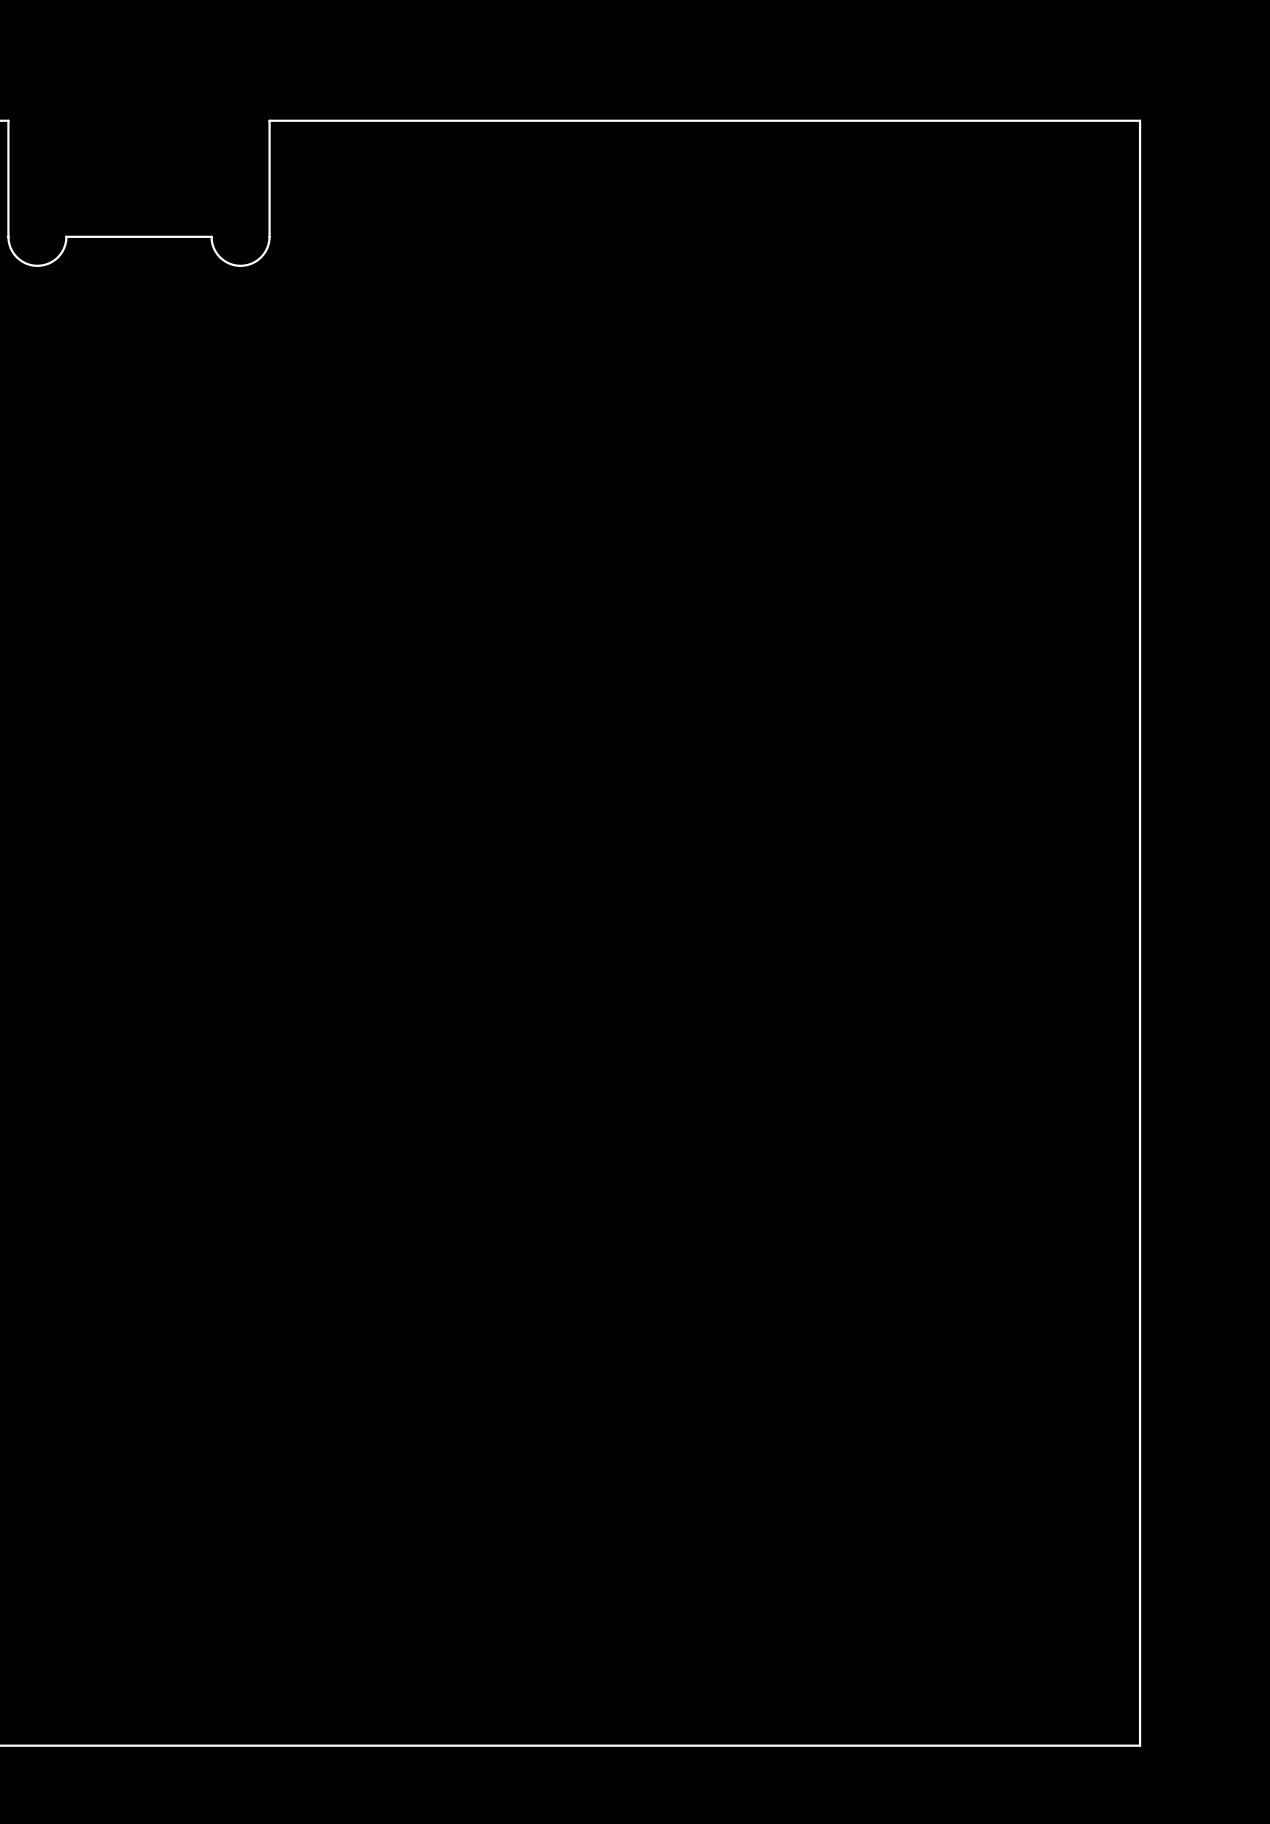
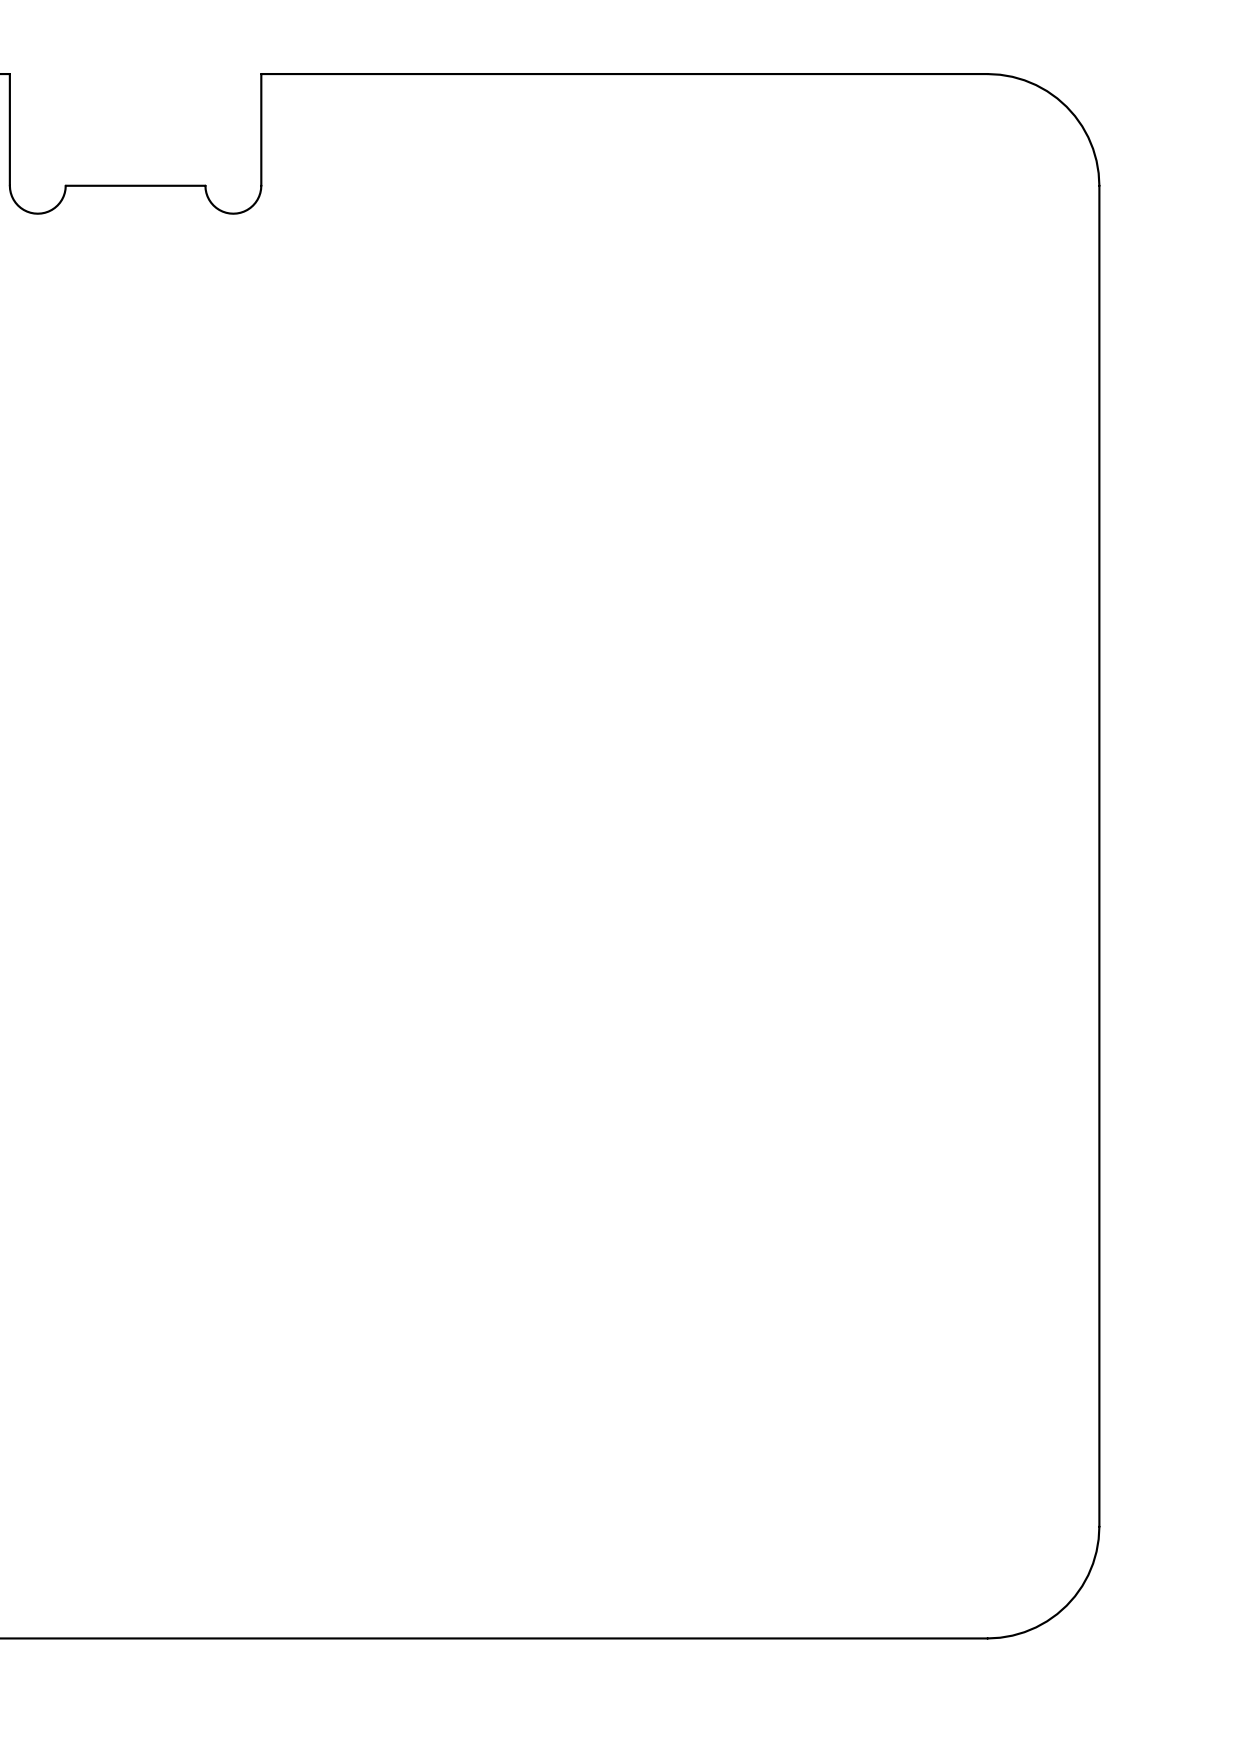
board edge: (1023, 120) (1140, 120) (1140, 236) -> (987, 74) (1012, 76) (1036, 85) (1066, 106) (1088, 137) (1096, 160) (1099, 185)
board edge: (1140, 1629) (1140, 1745) (1023, 1745) -> (1099, 1526) (1093, 1563) (1082, 1586) (1066, 1605) (1047, 1621) (1024, 1632) (987, 1638)

